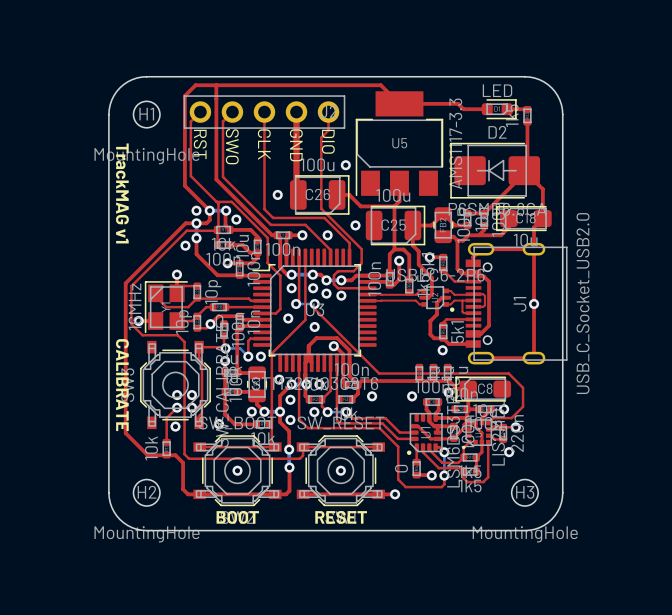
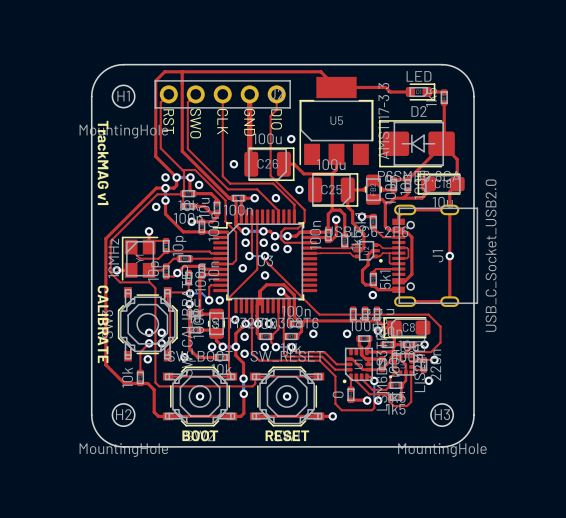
via: (431, 475) -> none
via: none -> (367, 400)
via: (444, 475) -> none
via: none -> (378, 400)

